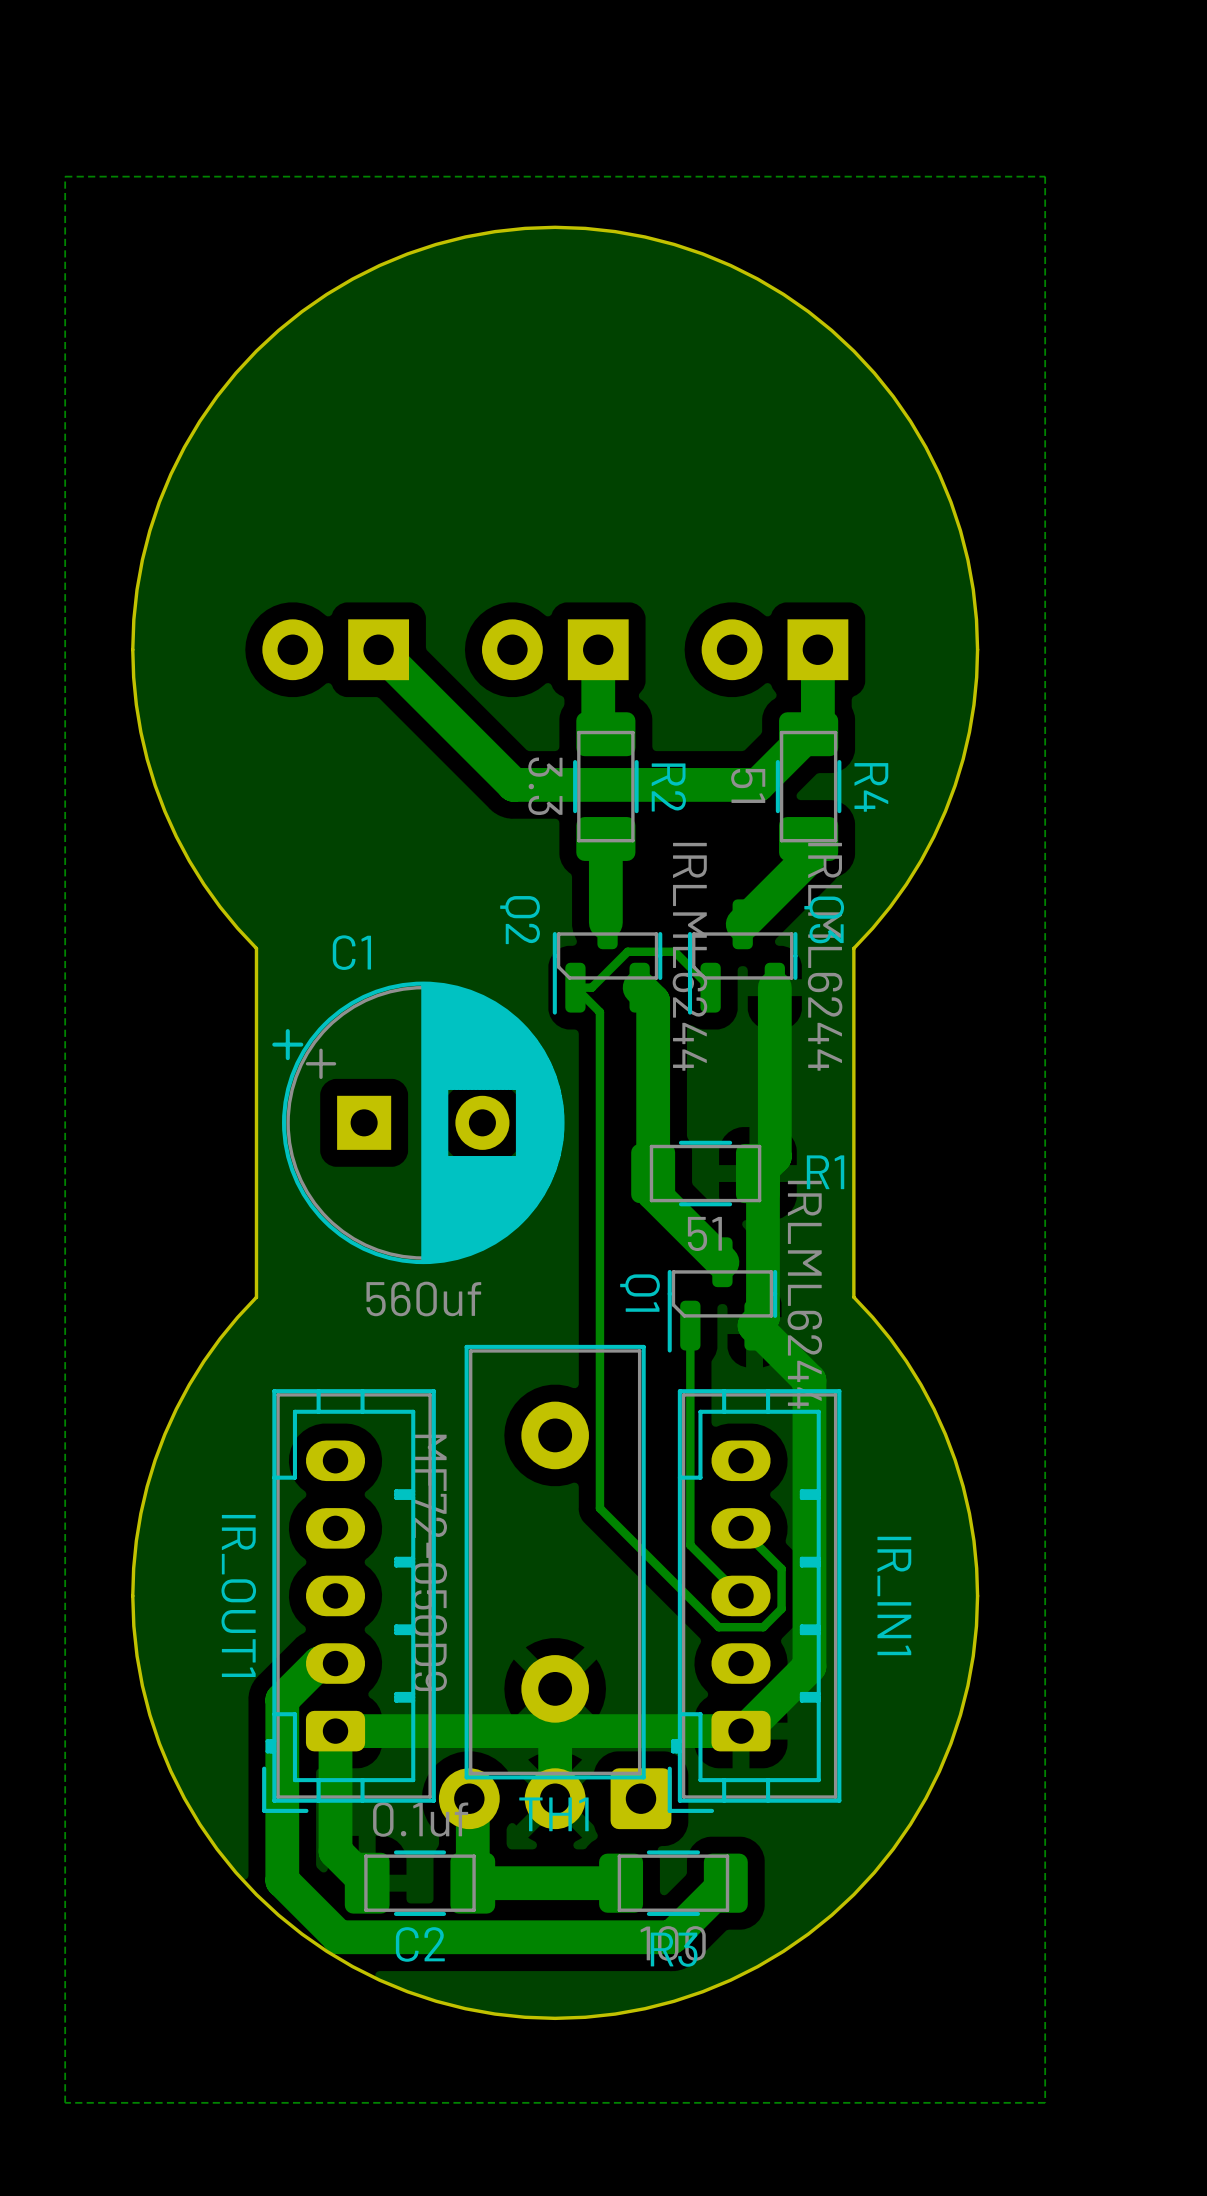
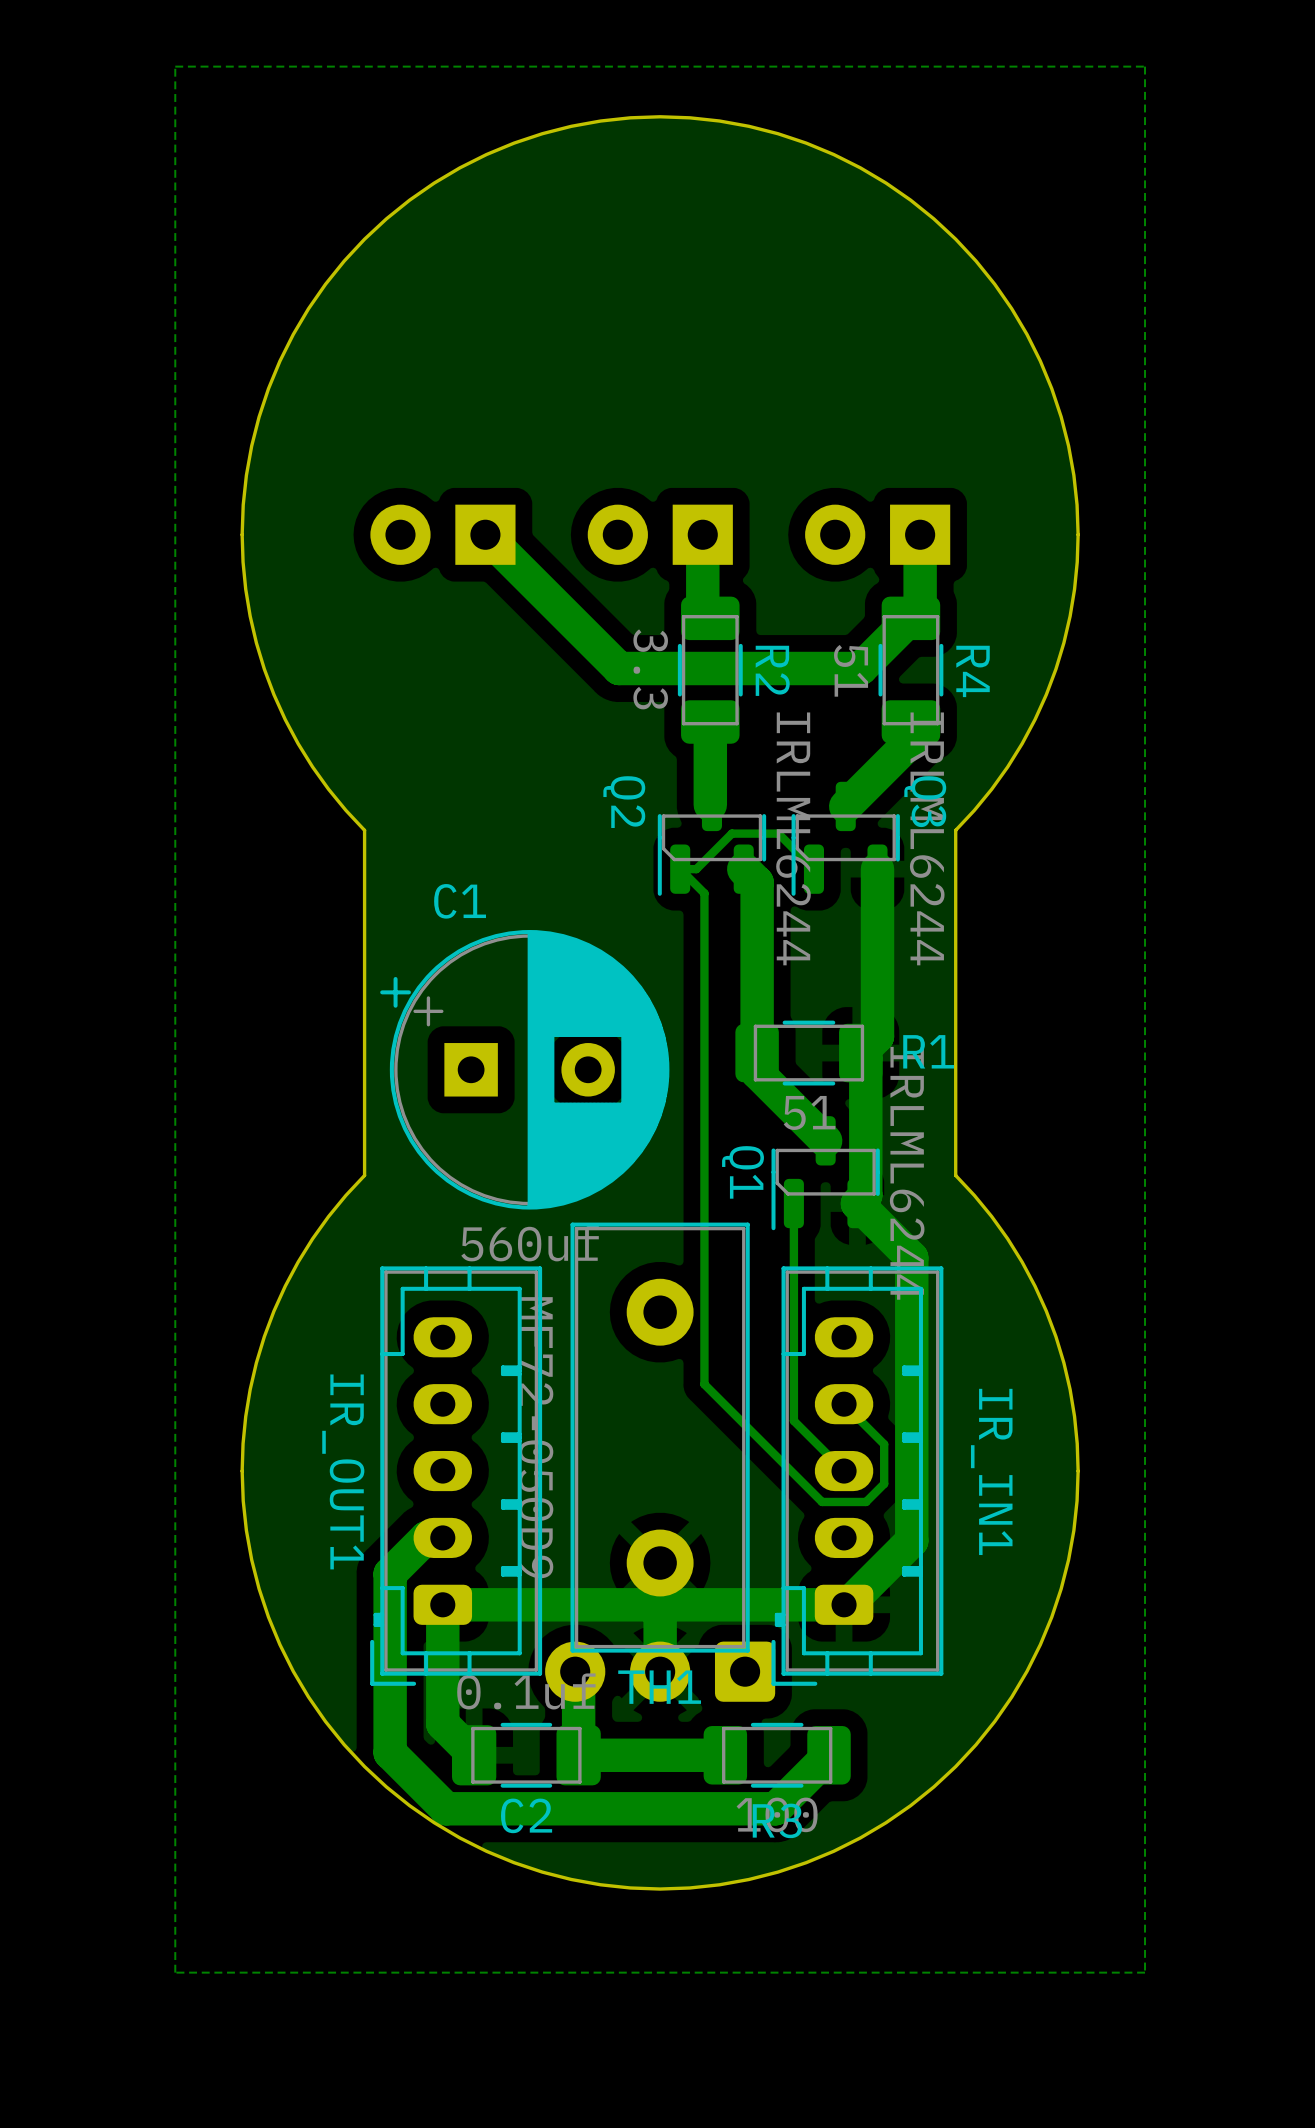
C1 position: (418, 1122) -> (524, 1069)

